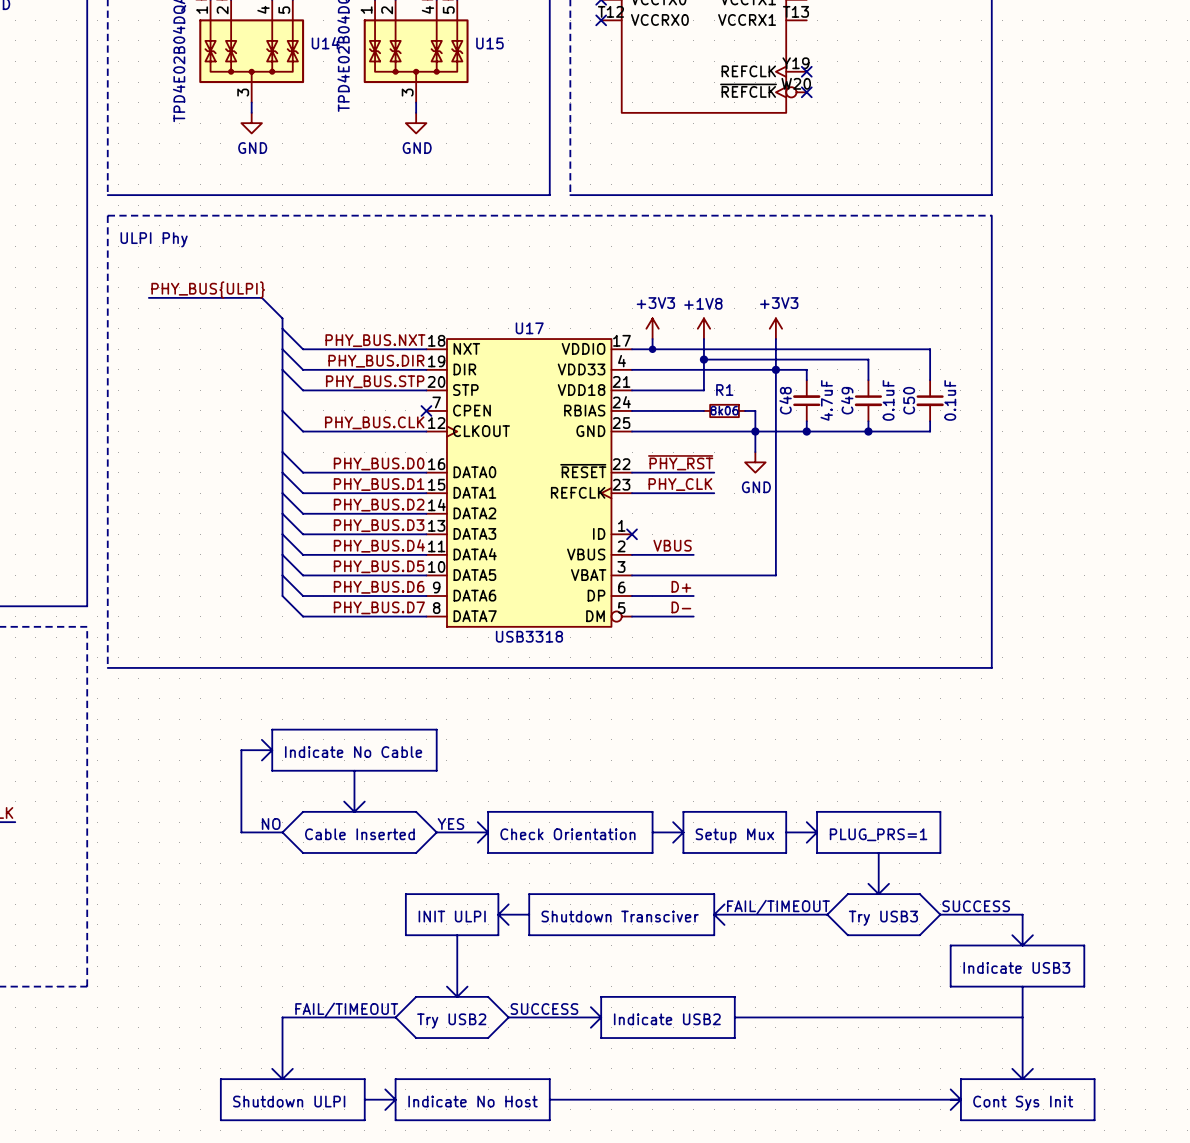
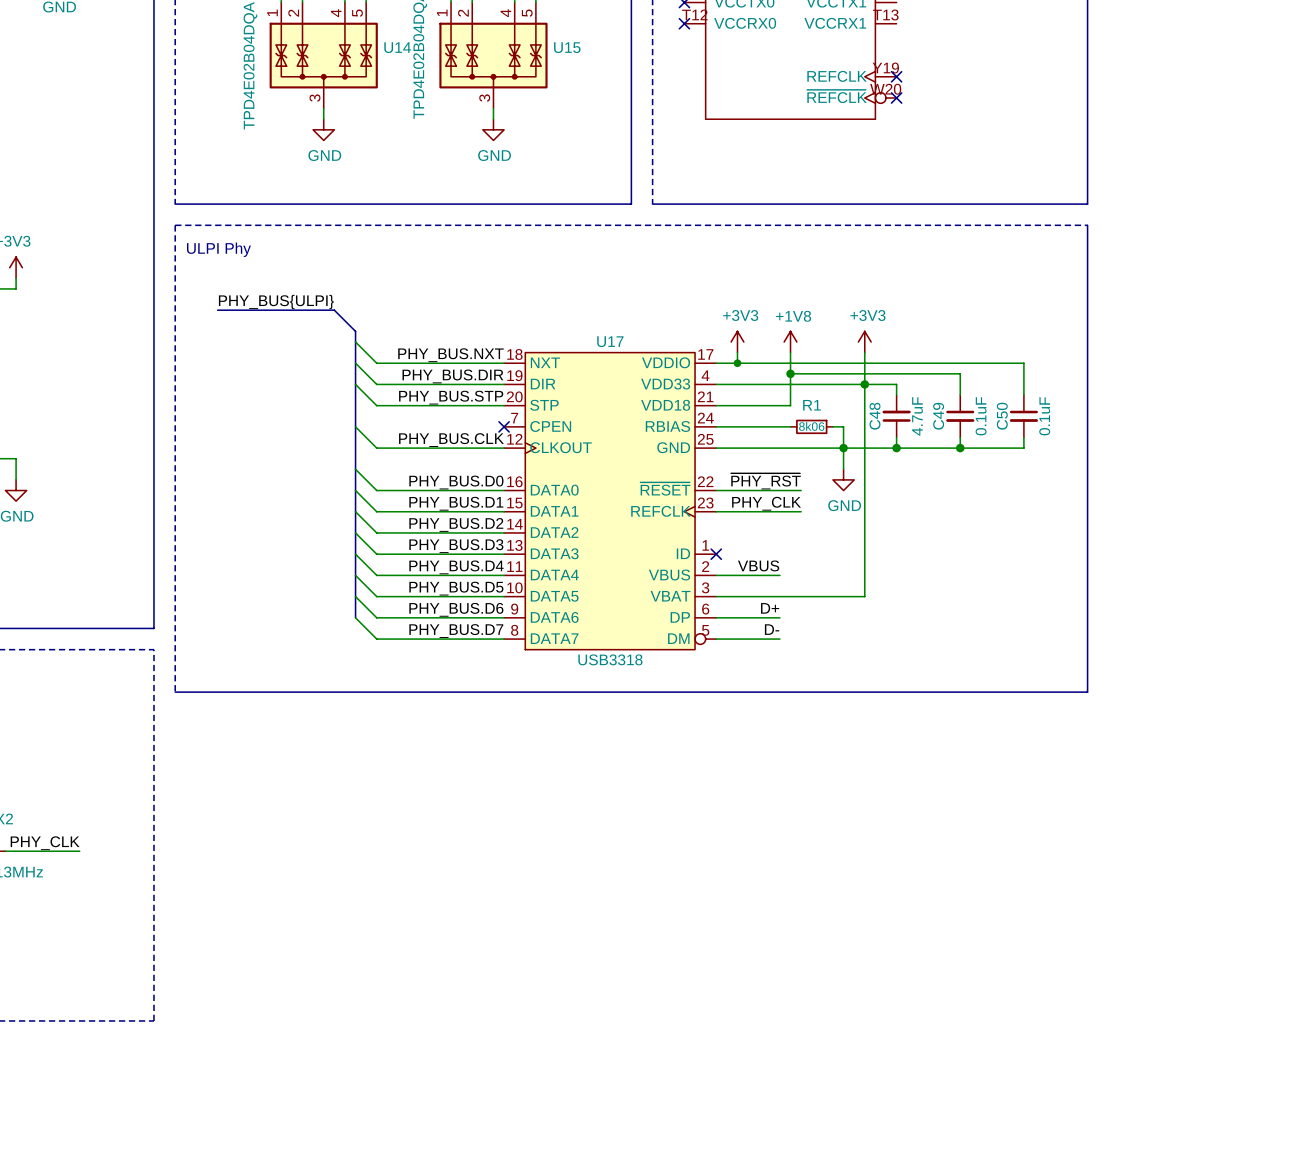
line: (272, 729) (436, 729) (436, 770) (272, 770) (272, 729) -> none
line: (261, 739) (272, 750) -> none
line: (272, 750) (241, 750) (241, 832) (282, 832) -> none
line: (272, 750) (261, 760) -> none
text: Indicate No Cable (353, 752) -> none
line: (354, 770) (354, 811) -> none
line: (344, 801) (354, 811) -> none
line: (364, 801) (354, 811) -> none
line: (488, 811) (488, 852) (652, 852) (652, 811) (488, 811) -> none
line: (683, 811) (786, 811) (786, 852) (683, 852) (683, 811) -> none
line: (817, 811) (817, 852) (940, 852) (940, 811) (817, 811) -> none
line: (477, 822) (488, 832) -> none
line: (673, 822) (683, 832) -> none
line: (806, 822) (817, 832) -> none
text: NO (271, 824) -> none
text: YES (450, 824) -> none
line: (282, 832) (303, 852) (416, 852) (436, 832) -> none
line: (282, 832) (303, 811) (416, 811) (436, 832) -> none
line: (436, 832) (488, 832) -> none
line: (488, 832) (477, 842) -> none
line: (652, 832) (683, 832) -> none
line: (683, 832) (673, 842) -> none
line: (786, 832) (817, 832) -> none
line: (817, 832) (806, 842) -> none
text: Cable Inserted (359, 834) -> none
text: Check Orientation (567, 834) -> none
text: PLUG_PRS=1 (878, 834) -> none
text: Setup Mux (734, 836) -> none
line: (878, 852) (878, 894) -> none
line: (868, 883) (878, 894) -> none
line: (888, 883) (878, 894) -> none
line: (405, 894) (498, 894) (498, 935) (405, 935) (405, 894) -> none
line: (529, 894) (714, 894) (714, 935) (529, 935) (529, 894) -> none
line: (508, 904) (498, 914) -> none
line: (724, 904) (714, 914) -> none
text: SUCCESS (976, 906) -> none
text: FAIL/TIMEOUT (778, 907) -> none
line: (498, 914) (529, 914) -> none
line: (498, 914) (508, 924) -> none
line: (714, 914) (827, 914) -> none
line: (714, 914) (724, 924) -> none
line: (827, 914) (847, 935) (919, 935) (940, 914) -> none
line: (827, 914) (847, 894) (919, 894) (940, 914) -> none
line: (940, 914) (1022, 914) (1022, 945) -> none
text: INIT ULPI (452, 916) -> none
text: Shutdown Transciver (620, 916) -> none
text: Try USB3 (883, 918) -> none
line: (457, 935) (457, 996) -> none
line: (1012, 935) (1022, 945) -> none
line: (1032, 935) (1022, 945) -> none
line: (950, 945) (950, 986) (1084, 986) (1084, 945) (950, 945) -> none
text: Indicate USB3 (1016, 967) -> none
line: (446, 986) (457, 996) -> none
line: (467, 986) (457, 996) -> none
line: (1022, 986) (1022, 1079) -> none
line: (601, 996) (601, 1038) (734, 1038) (734, 996) (601, 996) -> none
line: (590, 1007) (601, 1017) -> none
text: SUCCESS (544, 1009) -> none
text: FAIL/TIMEOUT (346, 1010) -> none
line: (395, 1017) (282, 1017) (282, 1079) -> none
line: (395, 1017) (416, 996) (488, 996) (508, 1017) -> none
line: (395, 1017) (416, 1038) (488, 1038) (508, 1017) -> none
line: (508, 1017) (601, 1017) -> none
line: (601, 1017) (590, 1027) -> none
line: (734, 1017) (1022, 1017) -> none
text: Indicate USB2 (667, 1019) -> none
text: Try USB2 (451, 1021) -> none
line: (272, 1068) (282, 1079) -> none
line: (292, 1068) (282, 1079) -> none
line: (1012, 1068) (1022, 1079) -> none
line: (1032, 1068) (1022, 1079) -> none
line: (220, 1079) (364, 1079) (364, 1120) (220, 1120) (220, 1079) -> none
line: (395, 1079) (549, 1079) (549, 1120) (395, 1120) (395, 1079) -> none
line: (960, 1079) (1094, 1079) (1094, 1120) (960, 1120) (960, 1079) -> none
line: (385, 1089) (395, 1099) -> none
line: (950, 1089) (960, 1099) -> none
line: (364, 1099) (395, 1099) -> none
line: (395, 1099) (385, 1109) -> none
line: (549, 1099) (960, 1099) -> none
line: (960, 1099) (950, 1109) -> none
text: Shutdown ULPI (289, 1101) -> none
text: Indicate No Host (473, 1101) -> none
text: Cont Sys Init (1023, 1103) -> none

